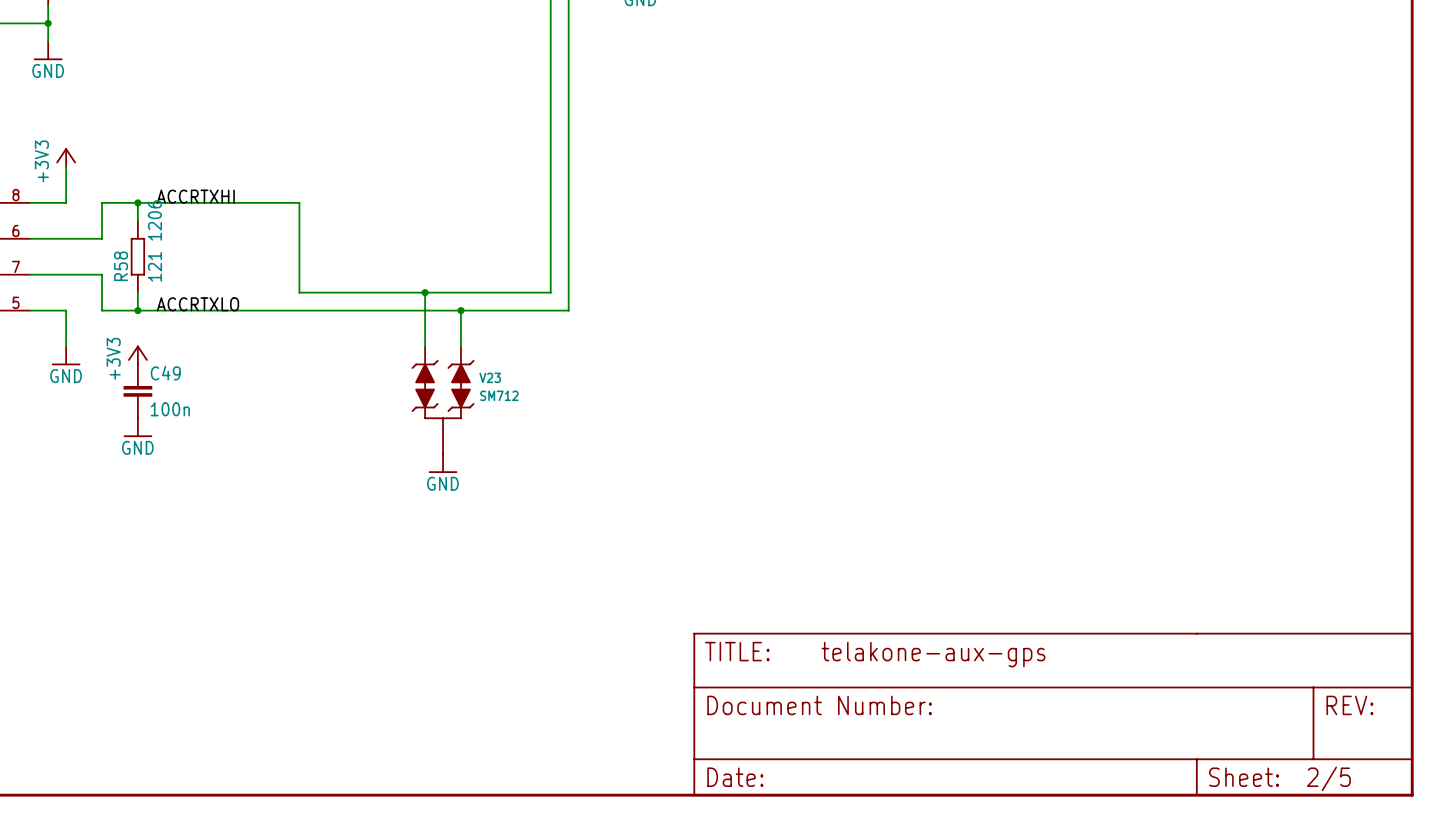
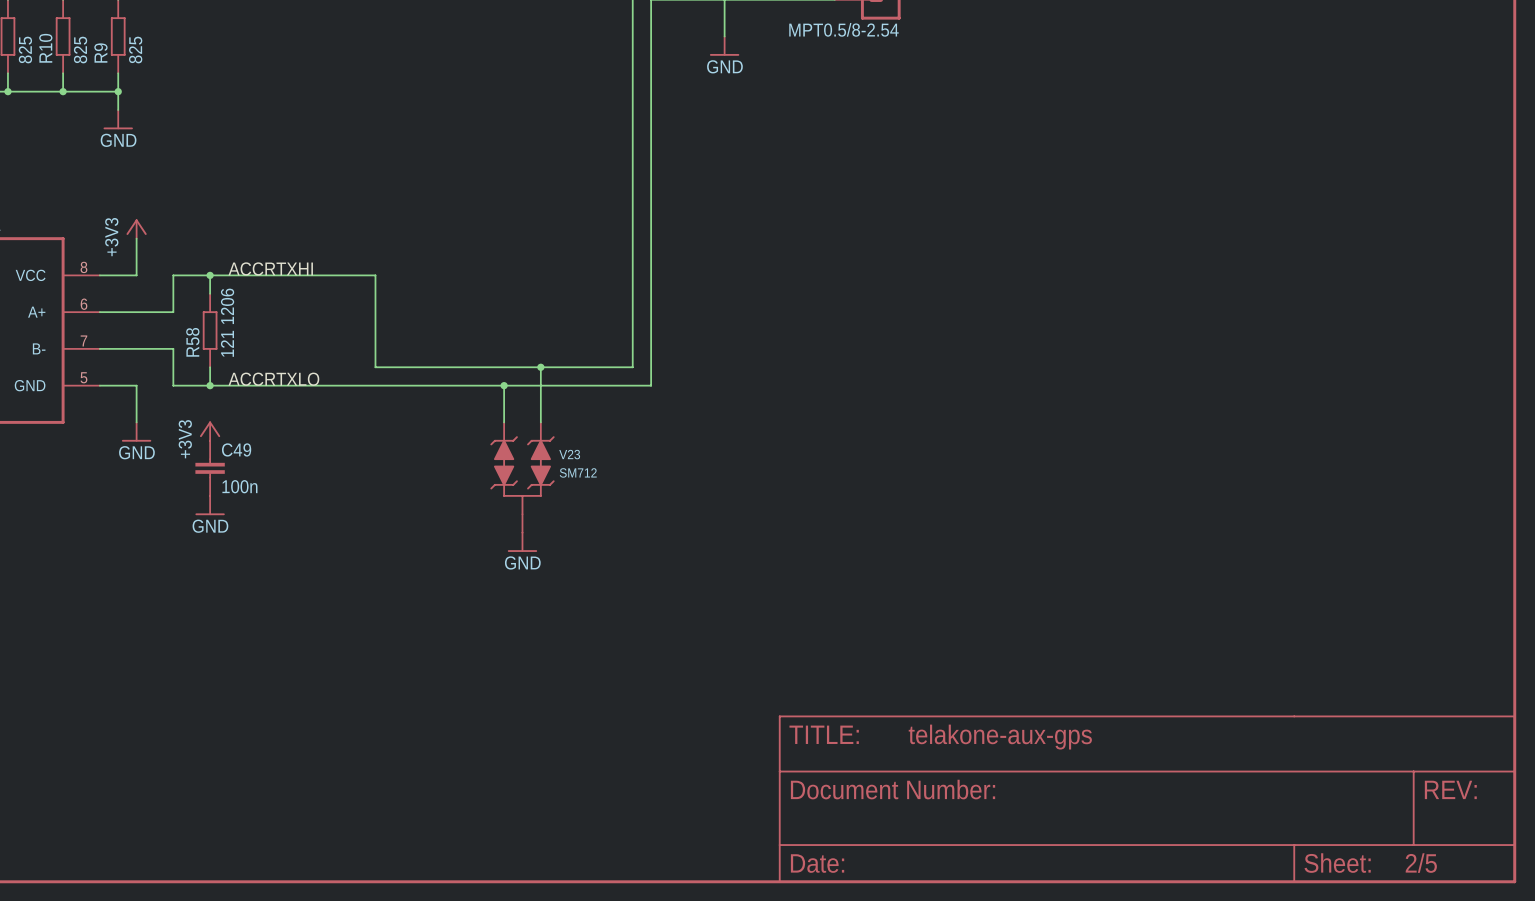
wire: (425, 292) (425, 310) -> (540, 367) (540, 385)
junction: (425, 292) -> none
junction: none -> (540, 367)
junction: none -> (504, 385)
junction: (460, 310) -> none

